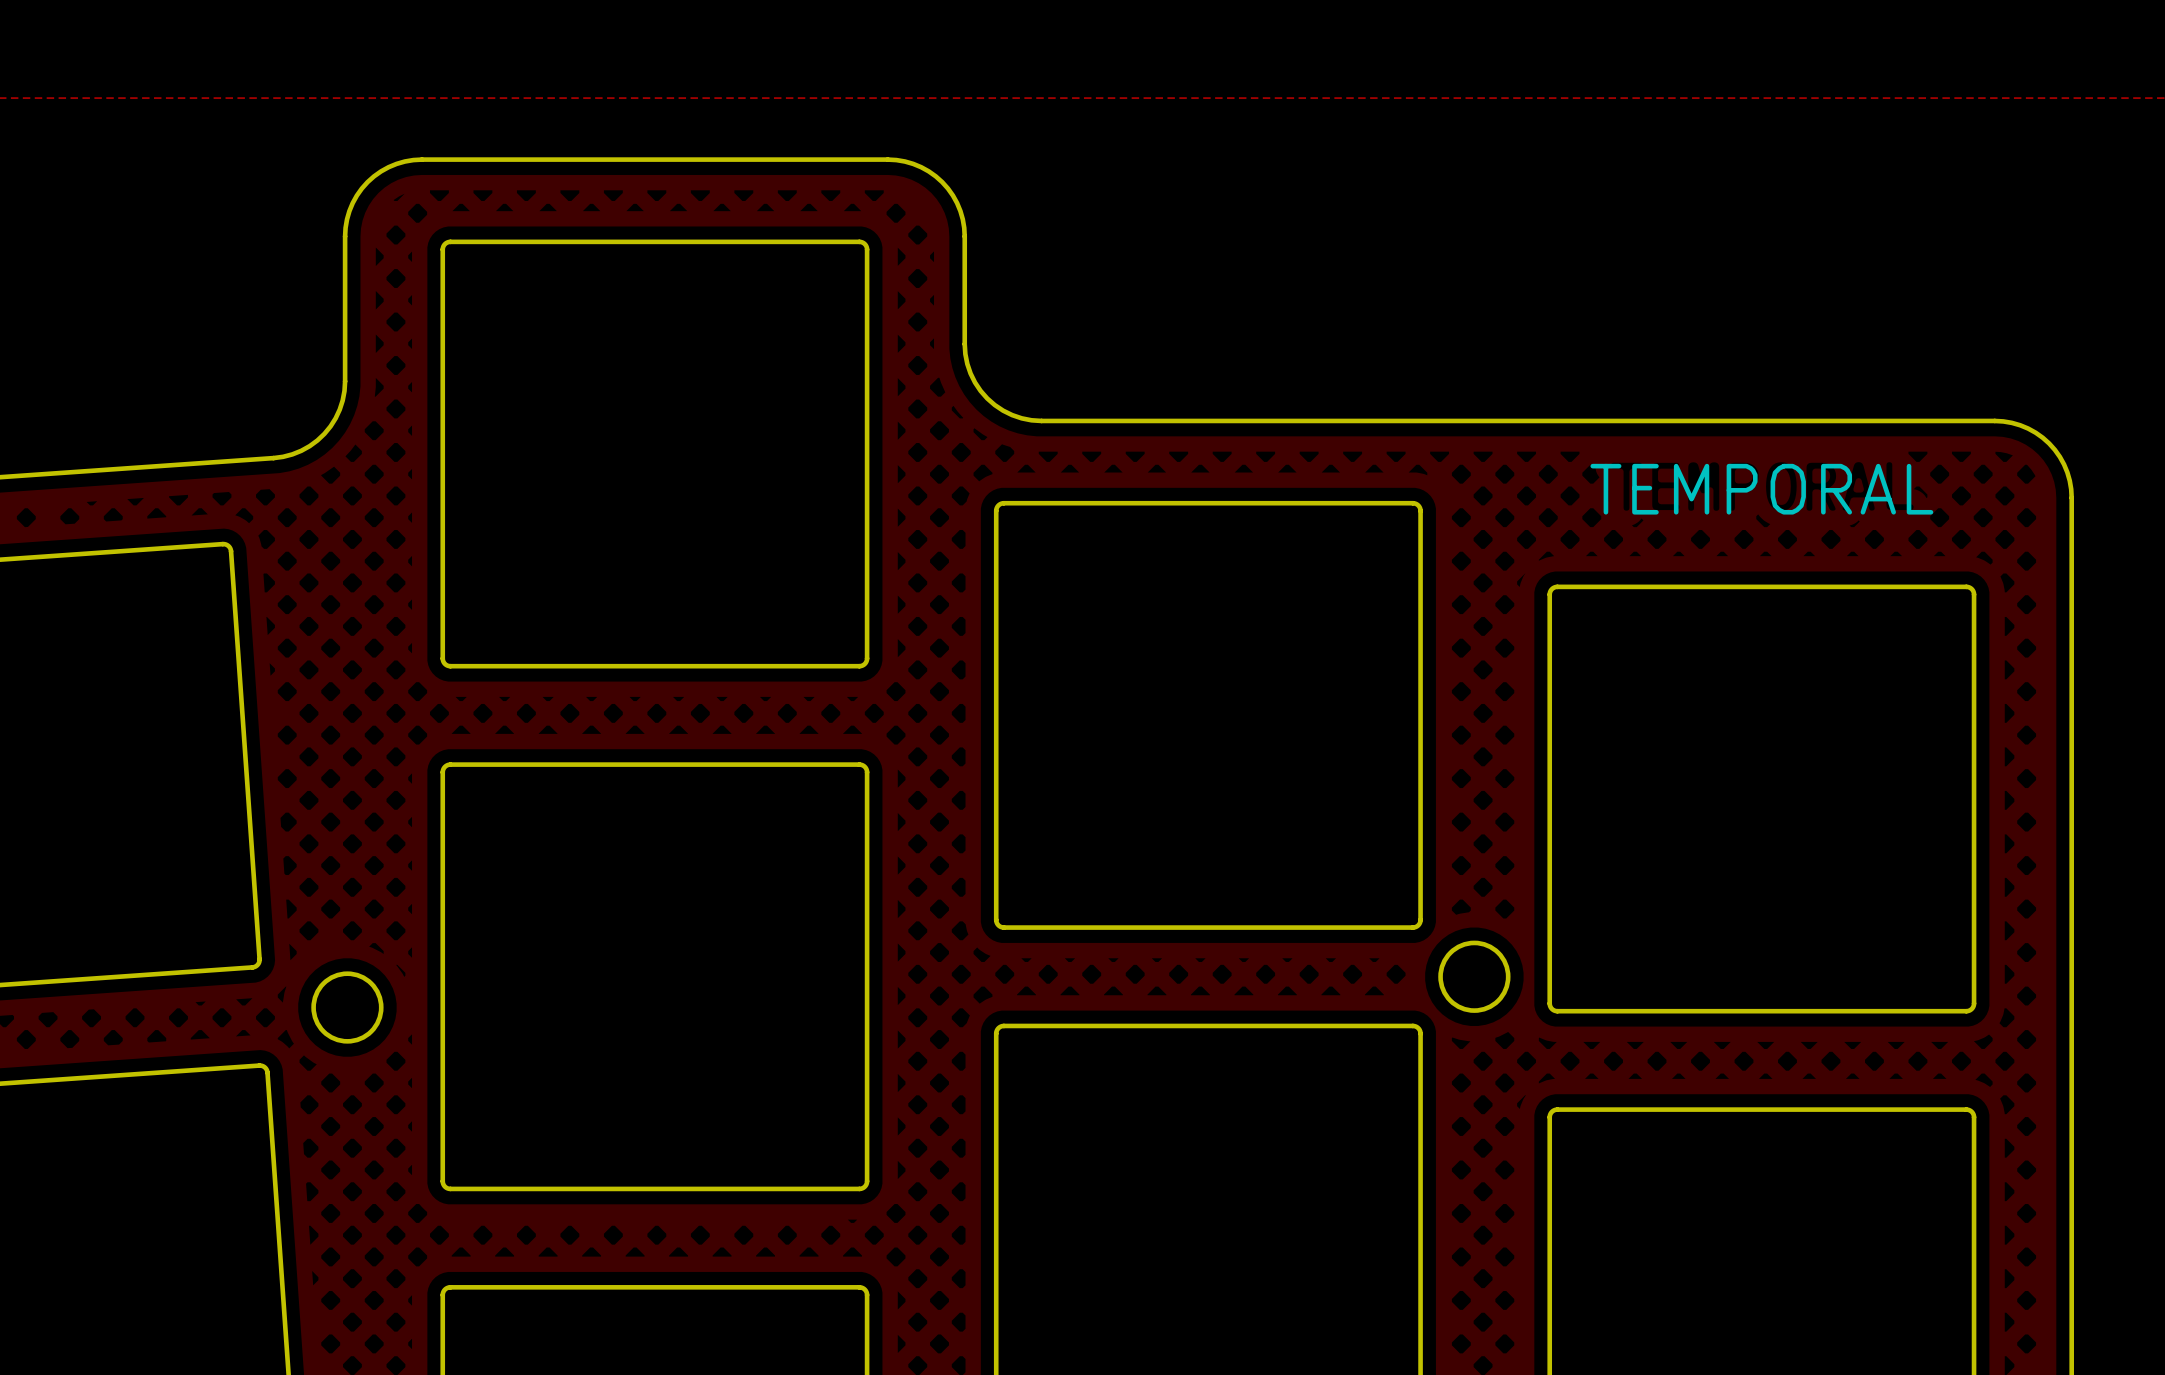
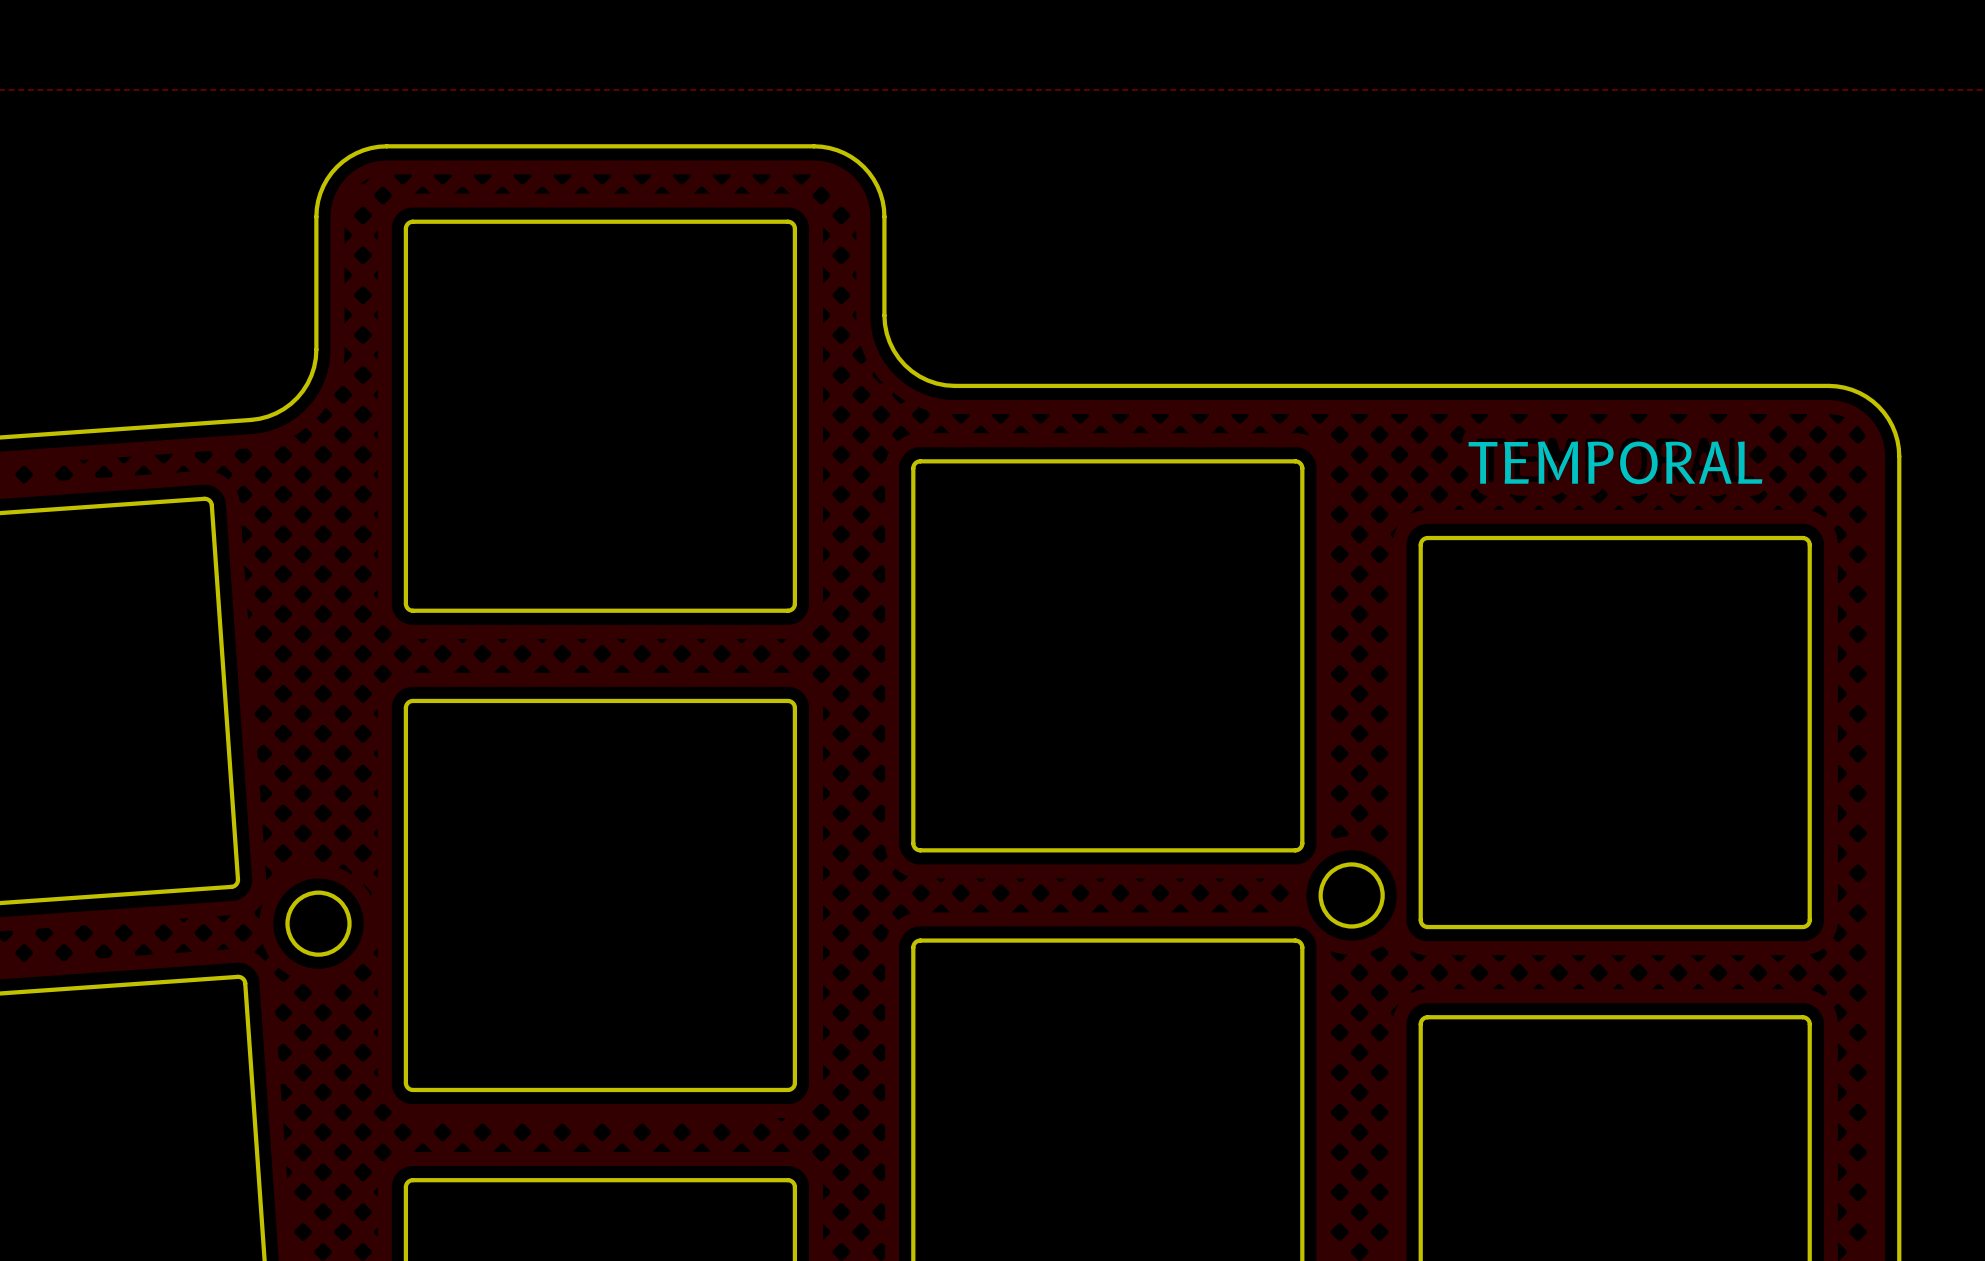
text position: TEMPORAL (1761, 489) -> TEMPORAL (1615, 462)

